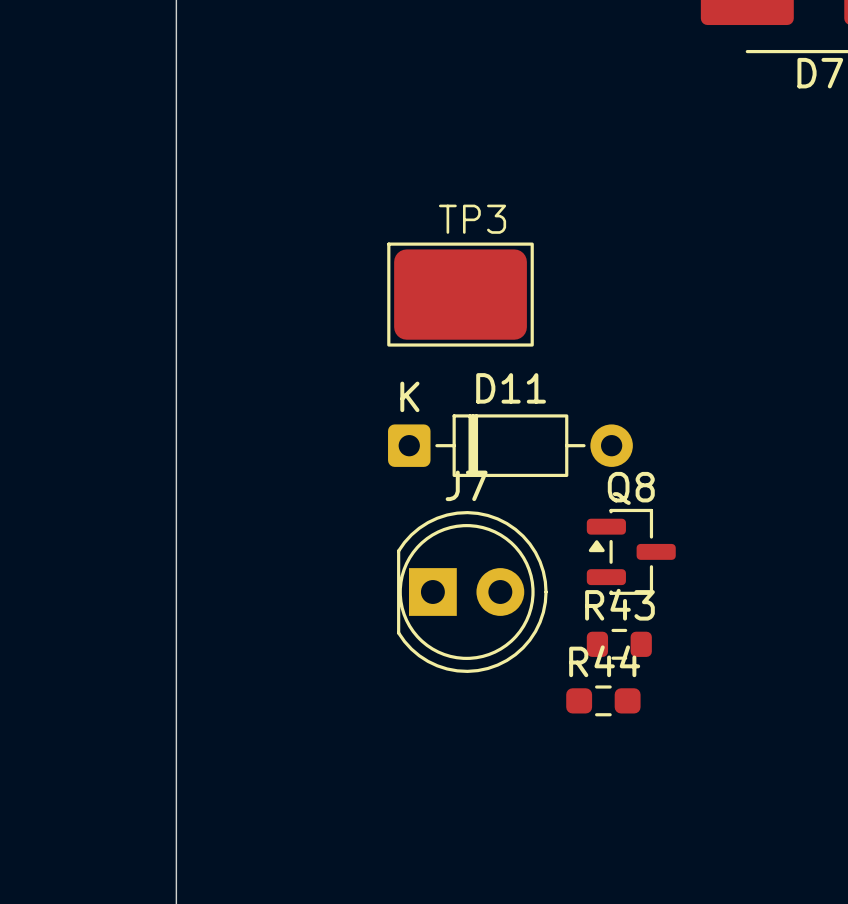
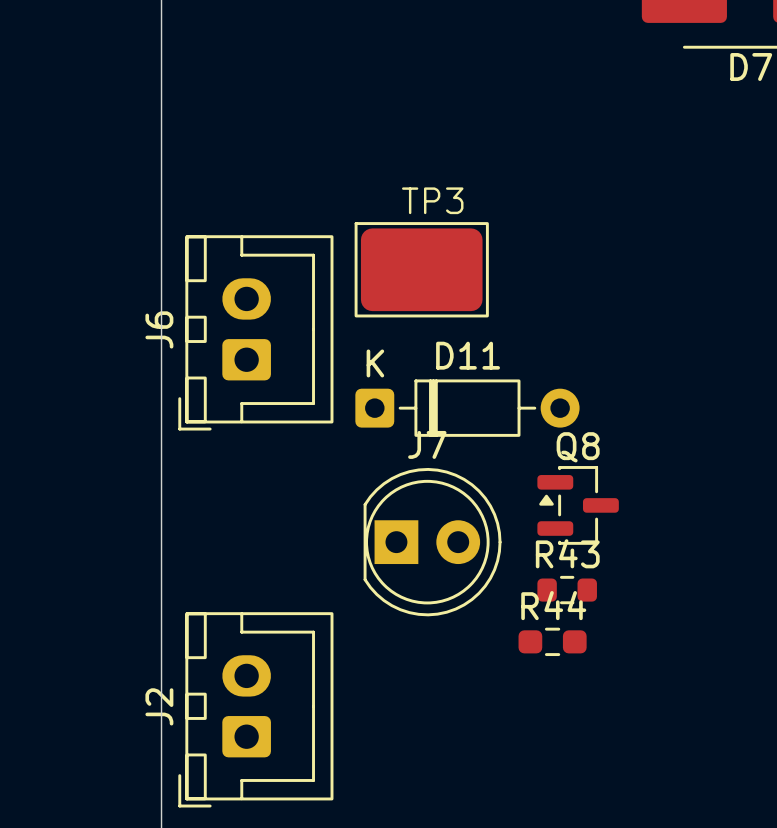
J6: none -> (255, 332)
J2: none -> (255, 709)

